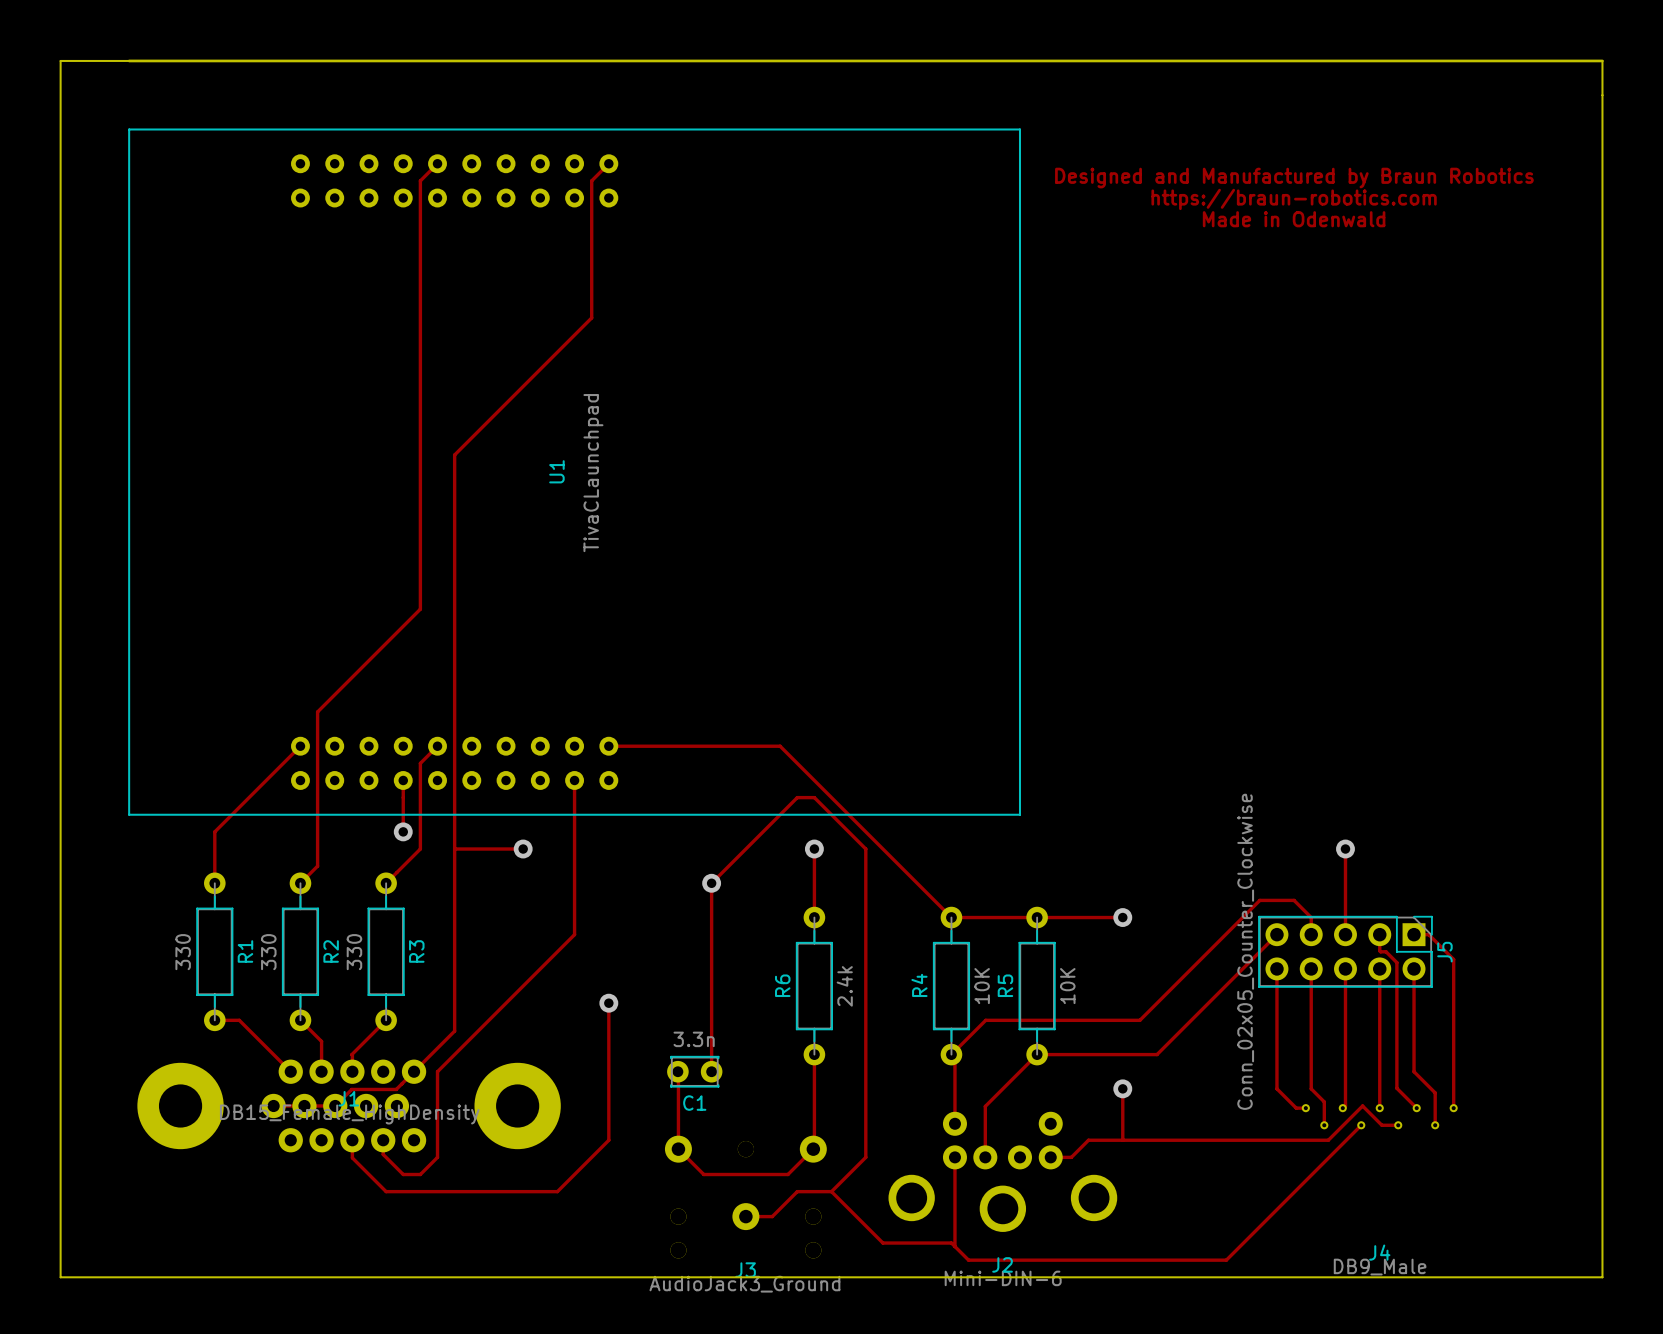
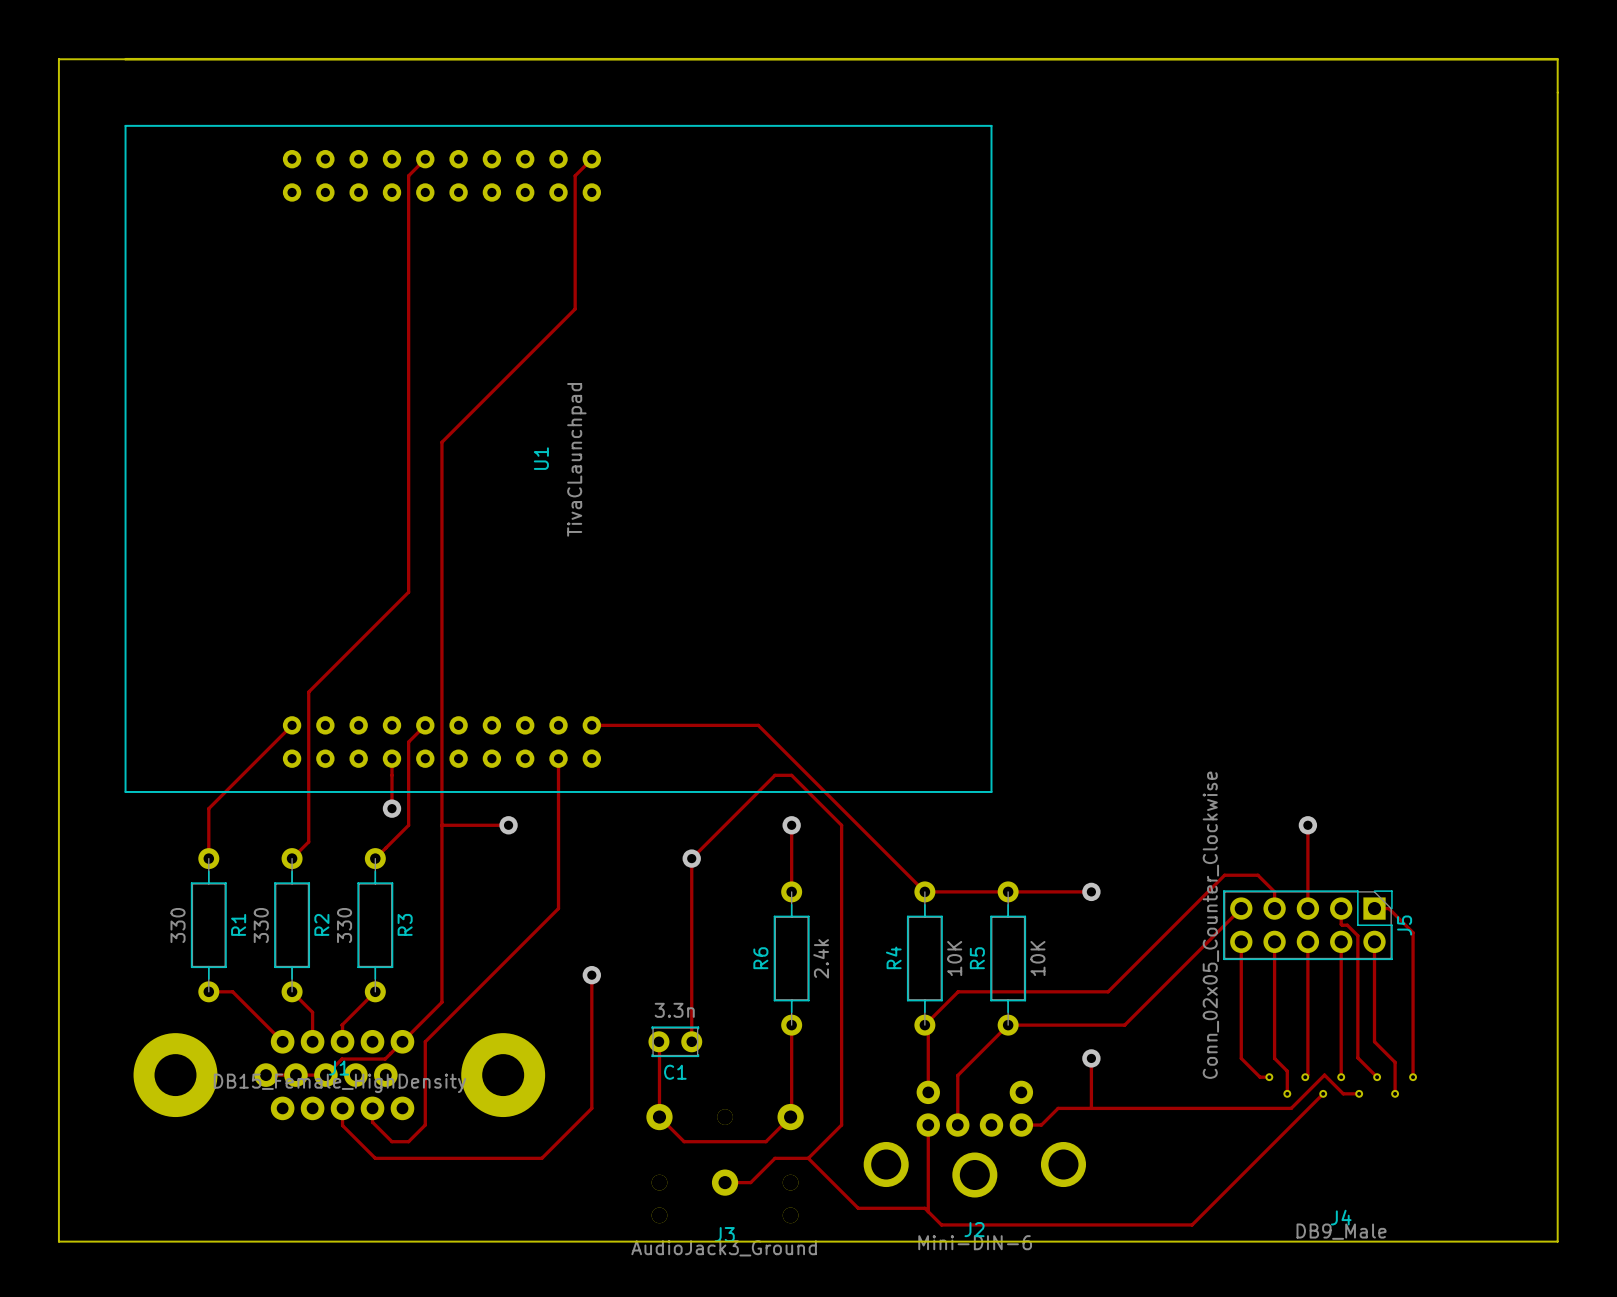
text: Designed and Manufactured by Braun Robotics (1294, 178) -> none
text: https://braun-robotics.com (1294, 199) -> none
text: Made in Odenwald (1294, 219) -> none

